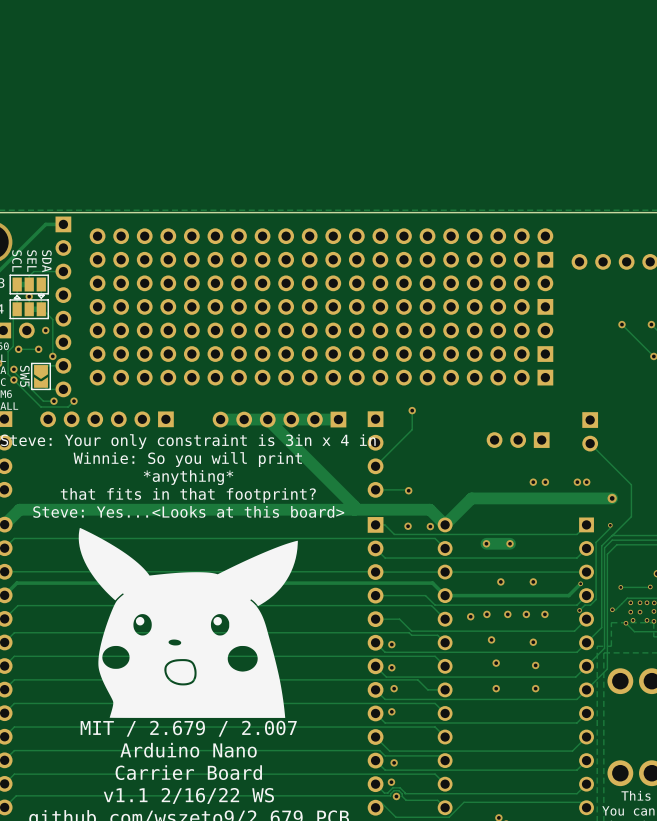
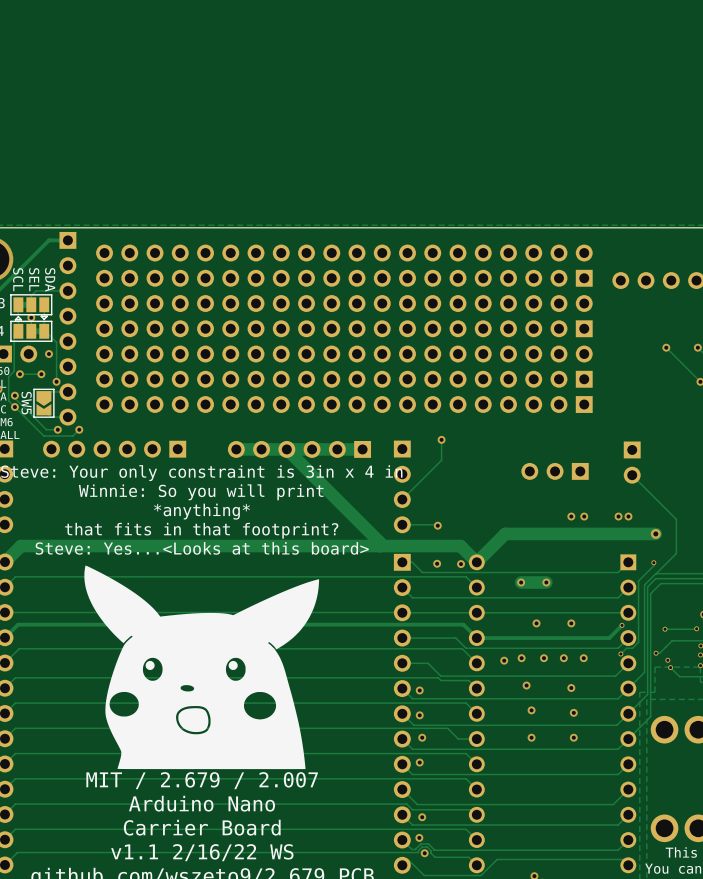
via: (630, 602) -> none
via: (640, 602) -> none
via: (646, 602) -> none
via: (630, 612) -> none
via: (640, 612) -> none
via: none -> (667, 660)
via: (633, 620) -> none
via: (646, 620) -> none

